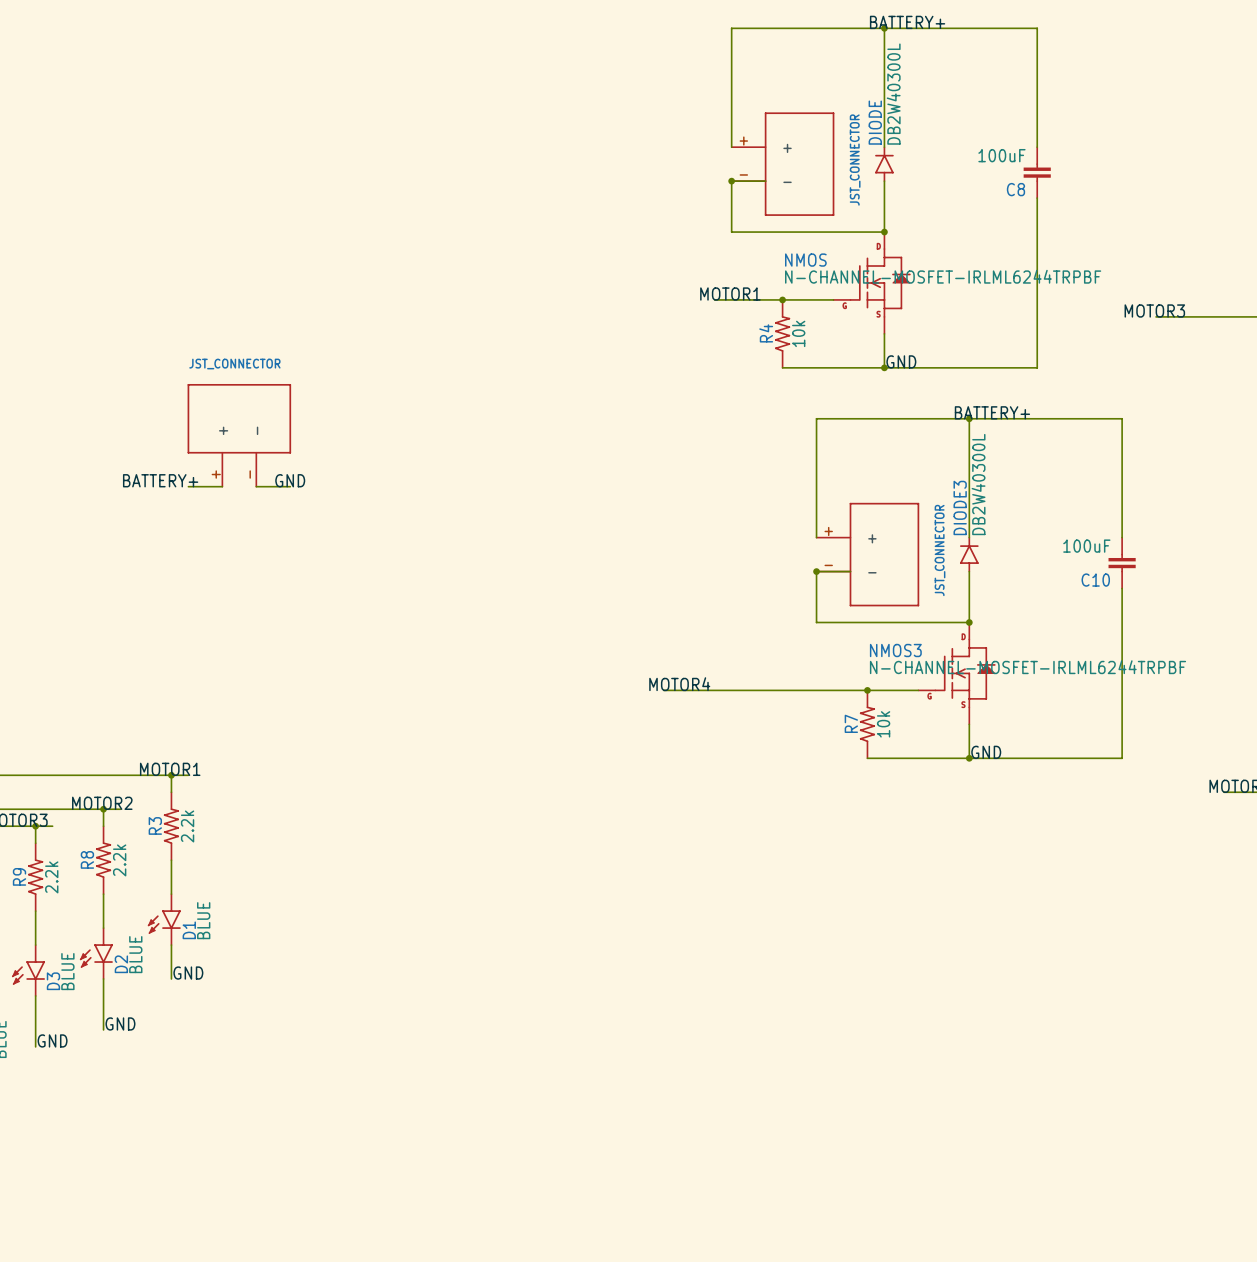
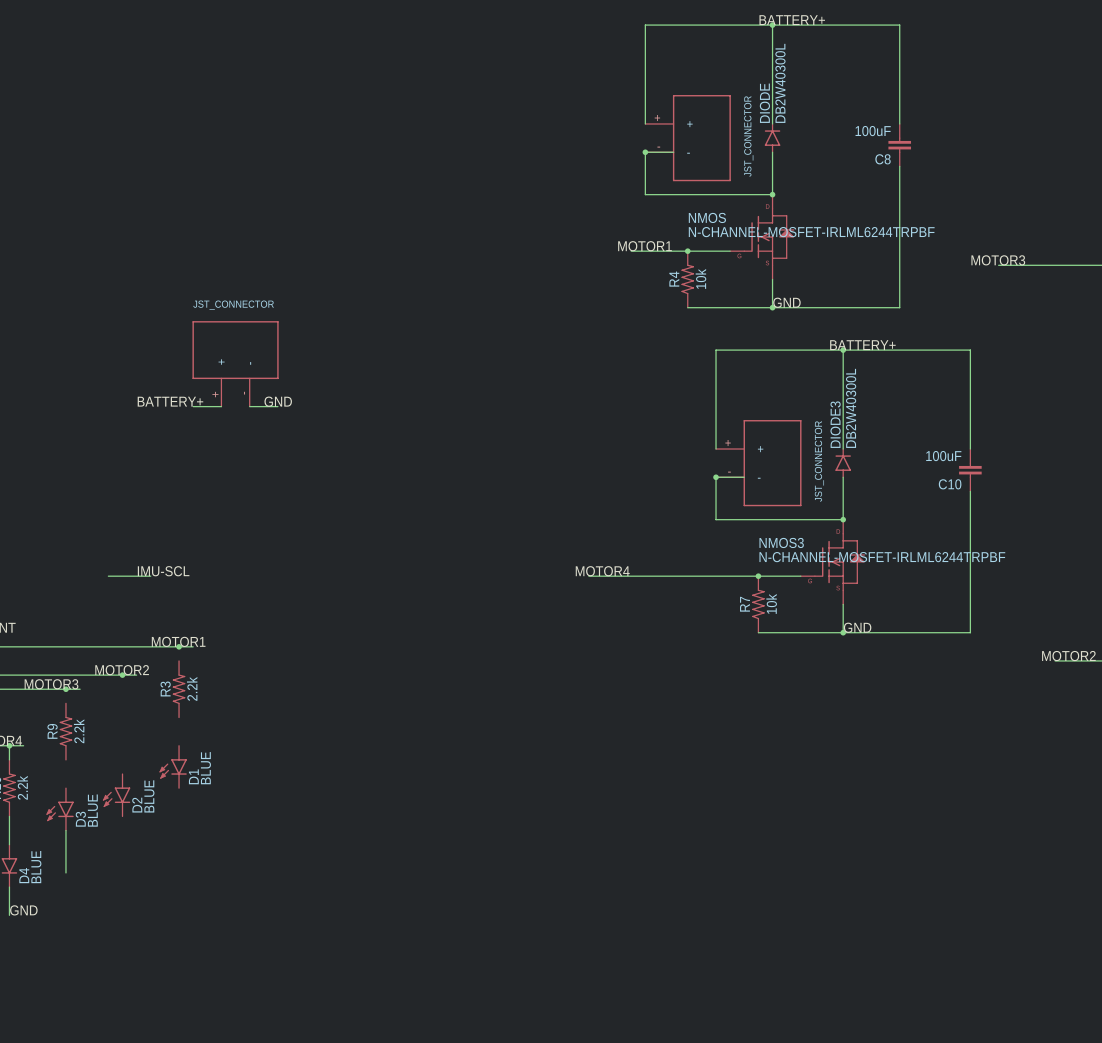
label: none -> IMU-SCL (163, 571)
wire: none -> (108, 576) (150, 576)
wire: (171, 775) (171, 792) -> none
wire: (103, 809) (103, 826) -> none
wire: (35, 826) (35, 843) -> none
R8: 2.2k (103, 860) -> none
wire: (171, 860) (171, 894) -> none
wire: (103, 894) (103, 928) -> none
wire: (35, 911) (35, 945) -> none
wire: (171, 945) (171, 978) -> none
label: GND (188, 973) -> none
wire: (103, 978) (103, 1029) -> none
label: GND (120, 1023) -> none
label: GND (52, 1040) -> none

